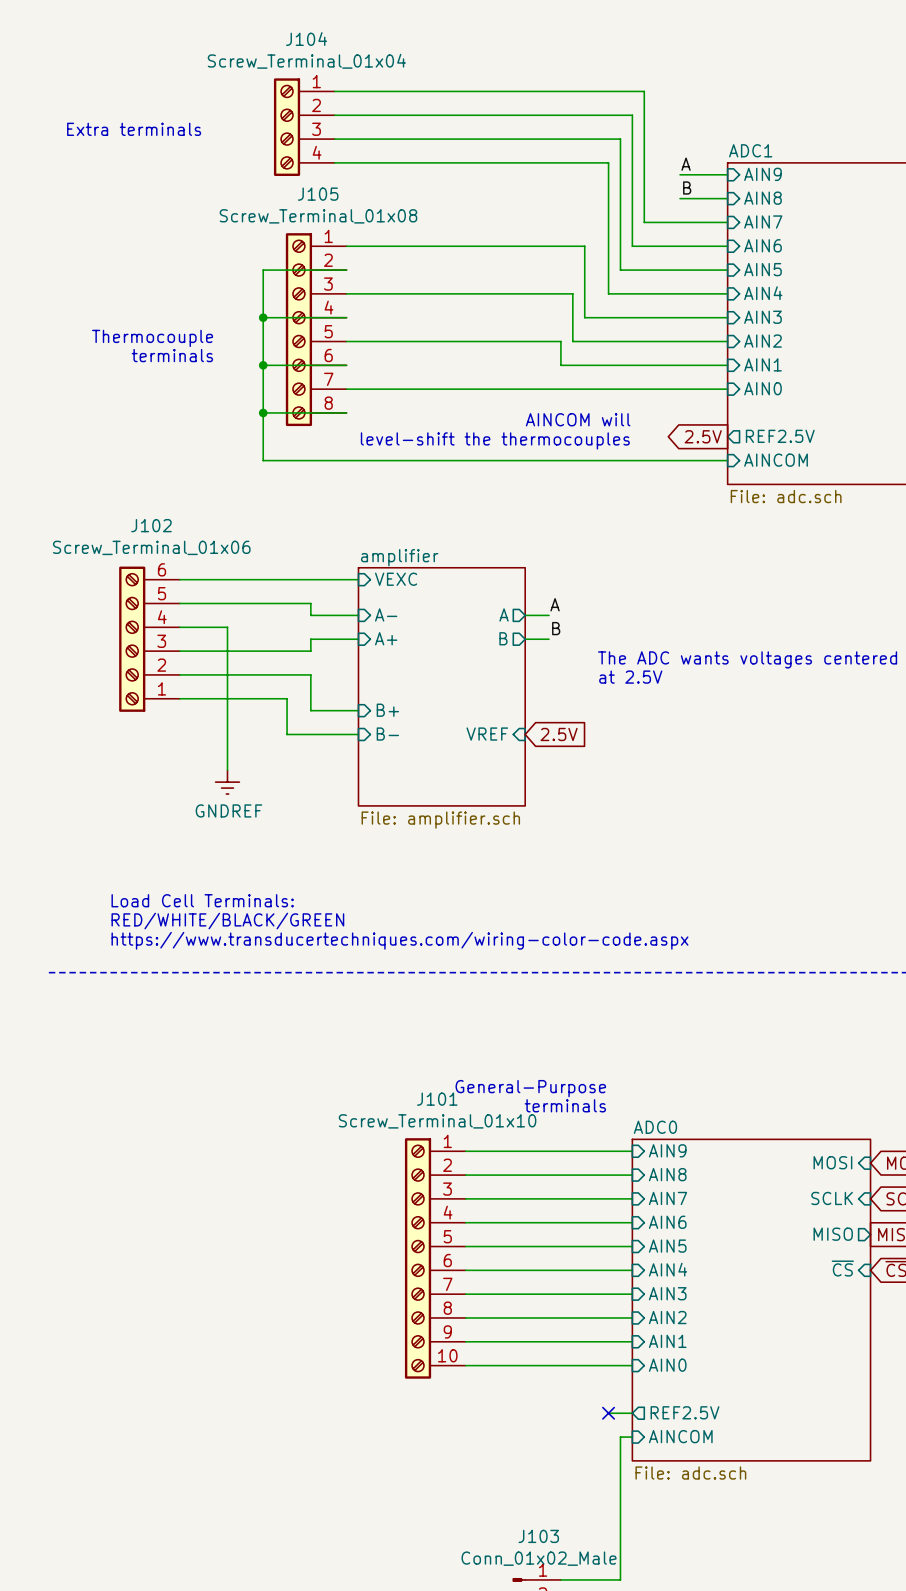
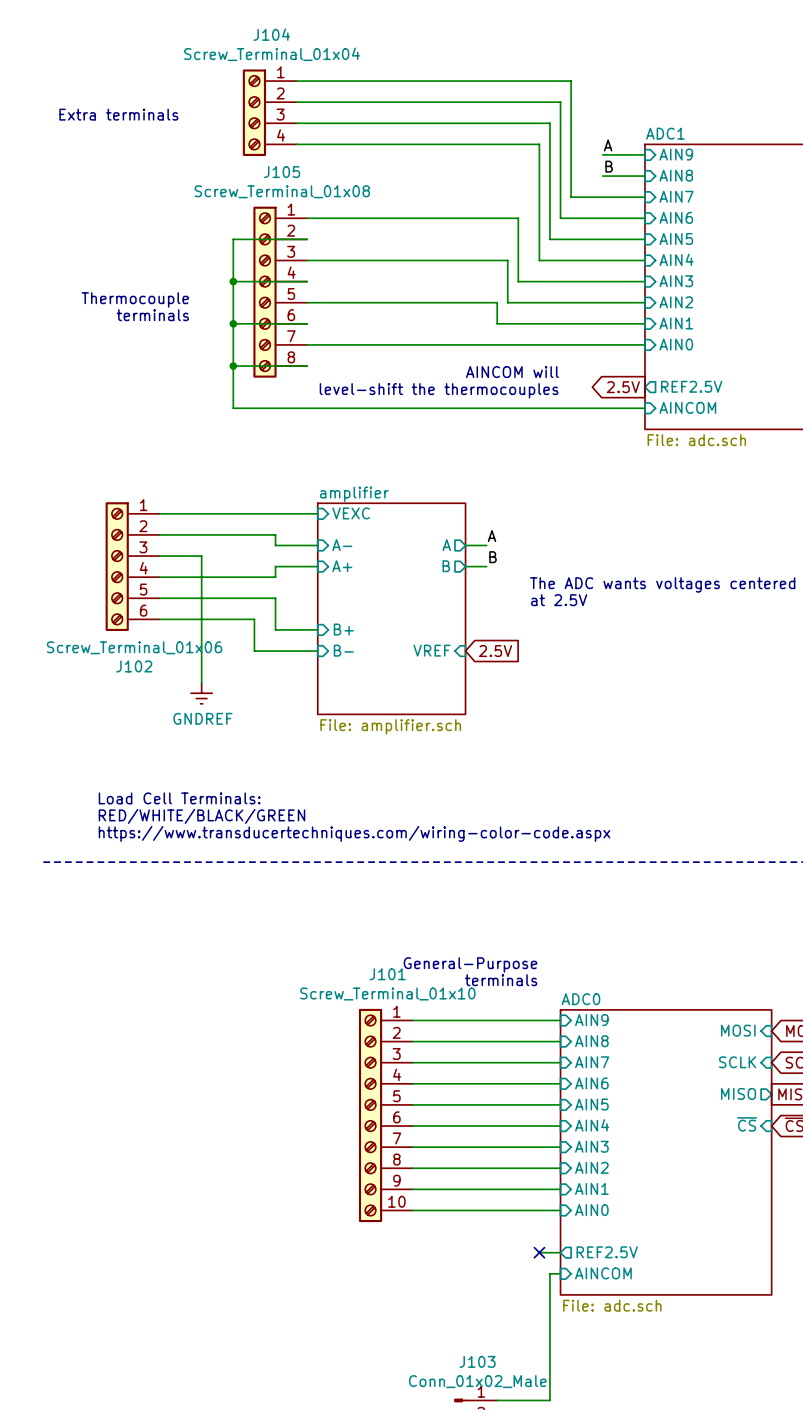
J102 flip: as is (132, 639) -> up-down (117, 566)

